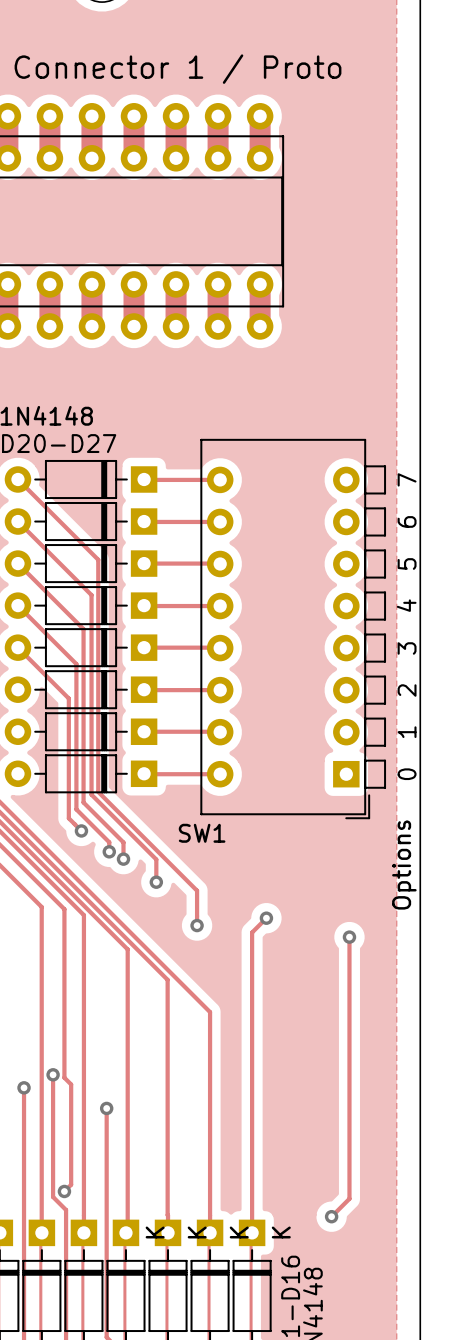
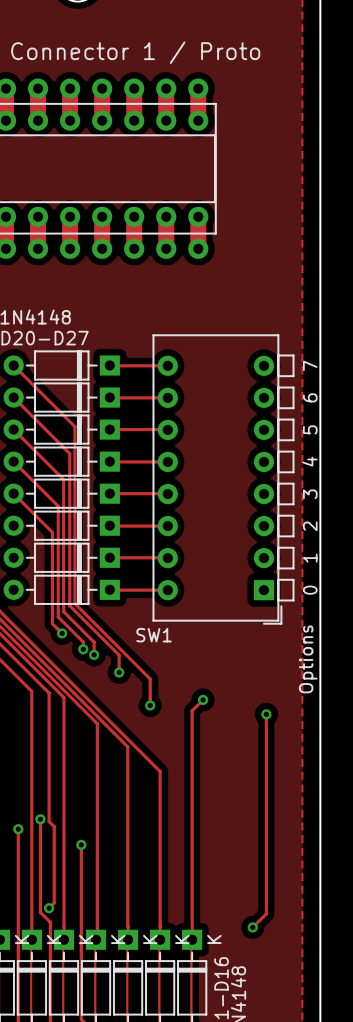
part text: none -> K (22, 939)
part text: none -> K (54, 939)
part text: none -> K (86, 939)

